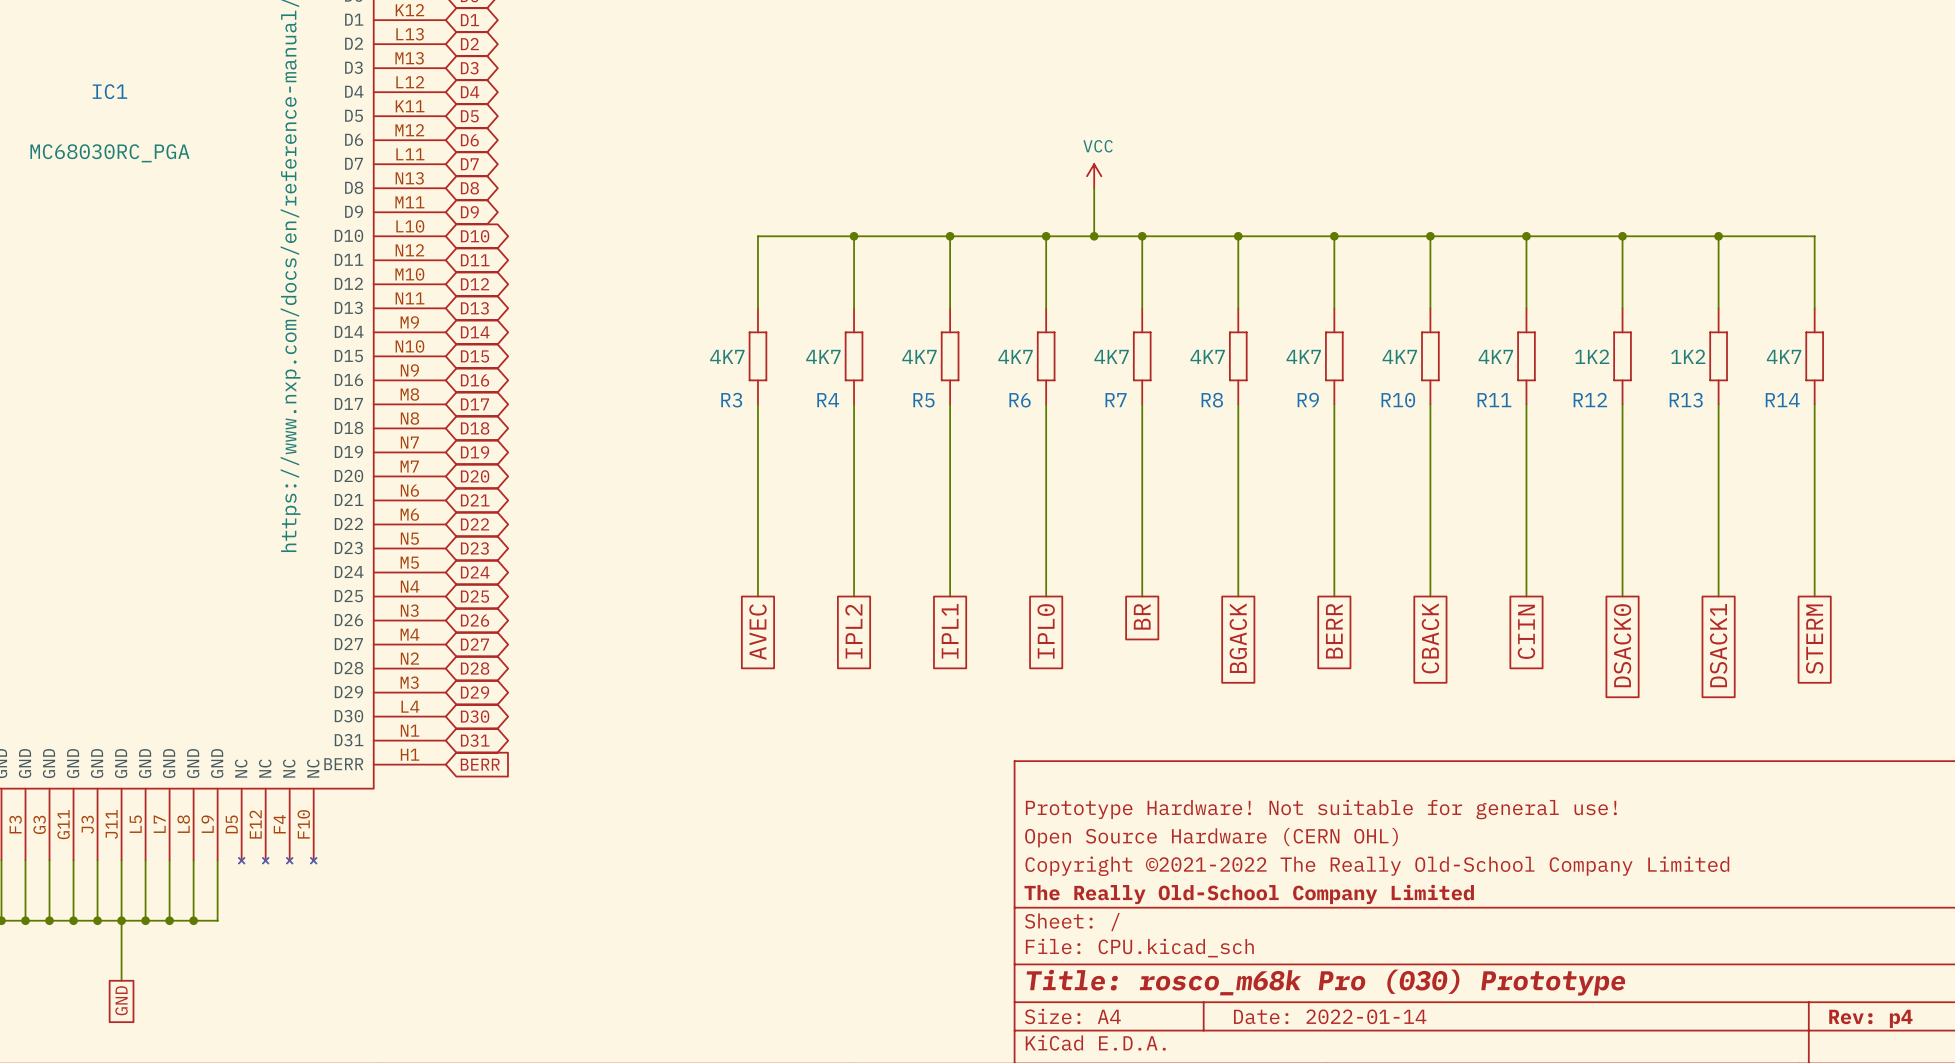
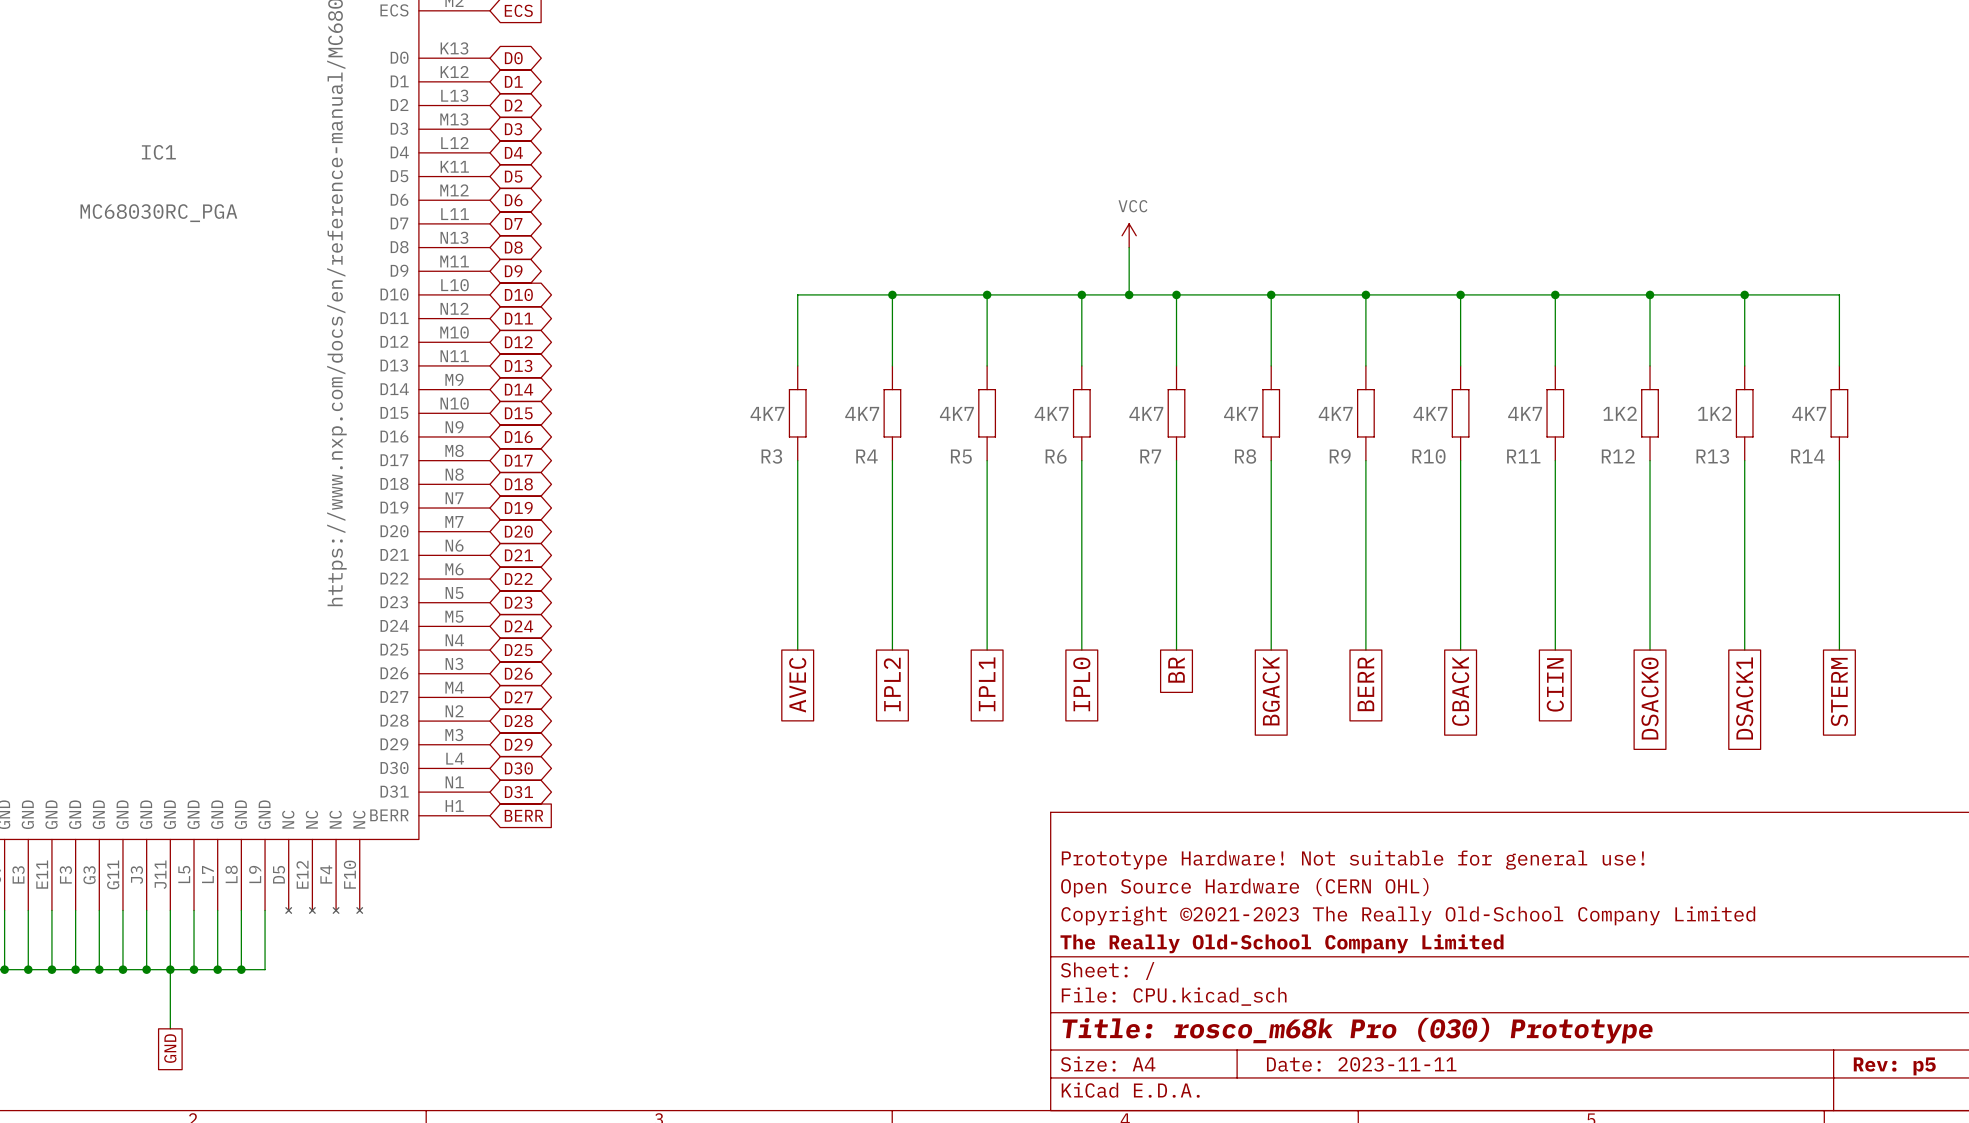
title block: Copyright ©2021-2022 The Really Old-School Company Limited (1377, 866) -> Copyright ©2021-2023 The Really Old-School Company Limited (1408, 915)
title block: Date: 2022-01-14 (1330, 1016) -> Date: 2023-11-11 (1361, 1064)
title block: Rev: p4 (1870, 1018) -> Rev: p5 (1894, 1066)

